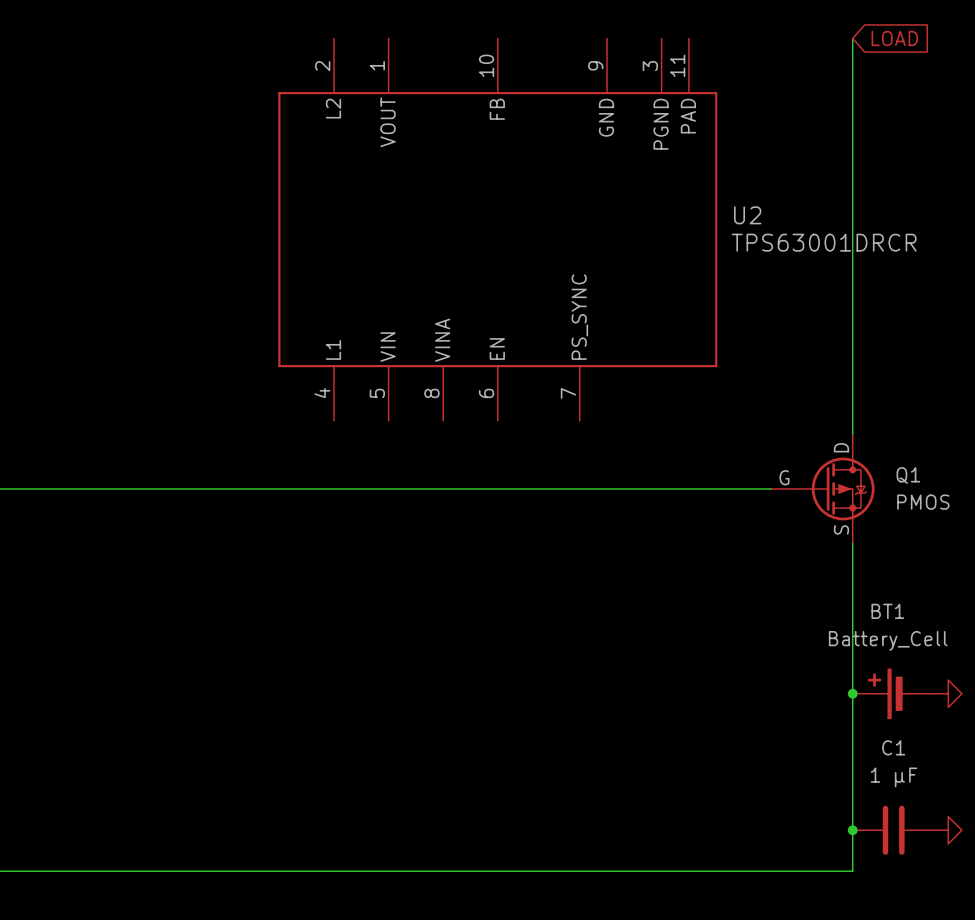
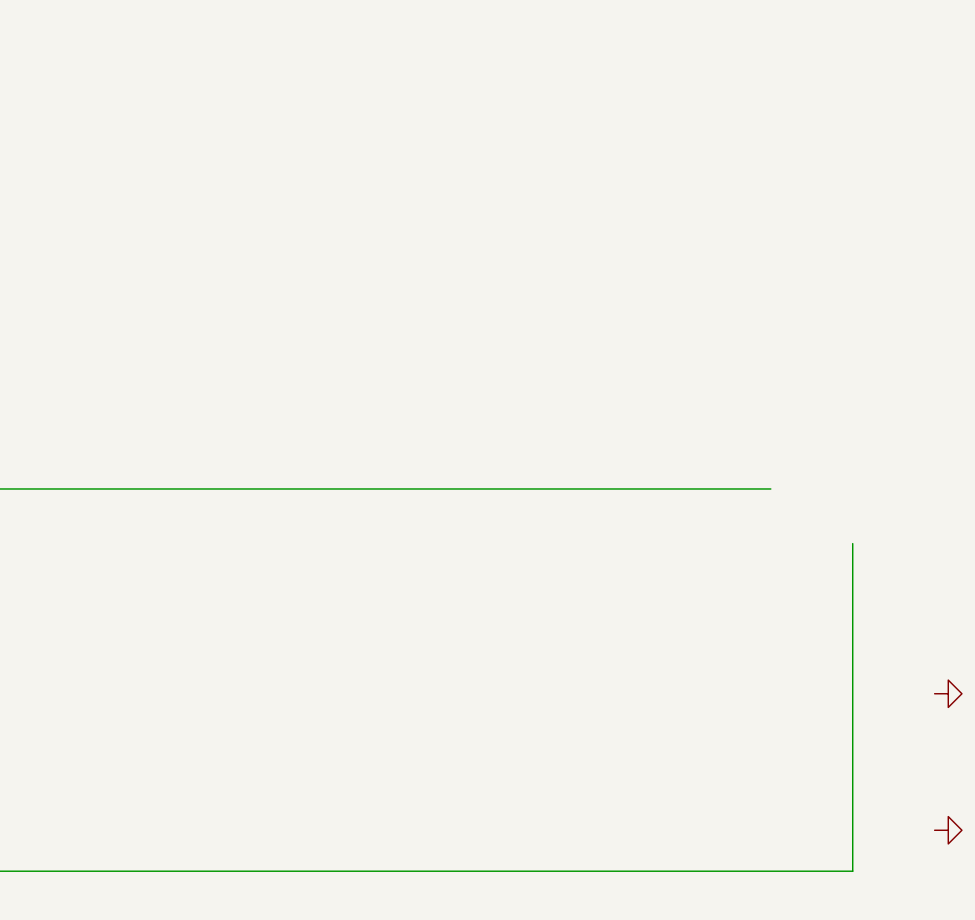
wire: (852, 38) (852, 434) -> none
global label: LOAD (894, 38) -> none
U2: TPS63001DRCR (497, 229) -> none
Q1: PMOS (822, 488) -> none
junction: (852, 693) -> none
BT1: Battery_Cell (893, 693) -> none
junction: (852, 830) -> none
C1: 1 μF (893, 830) -> none

